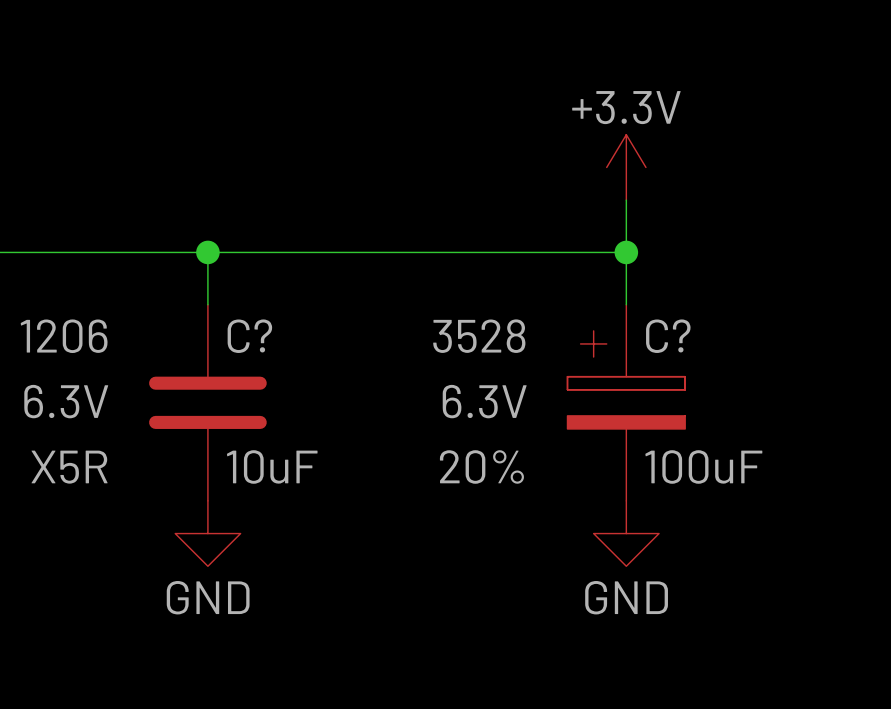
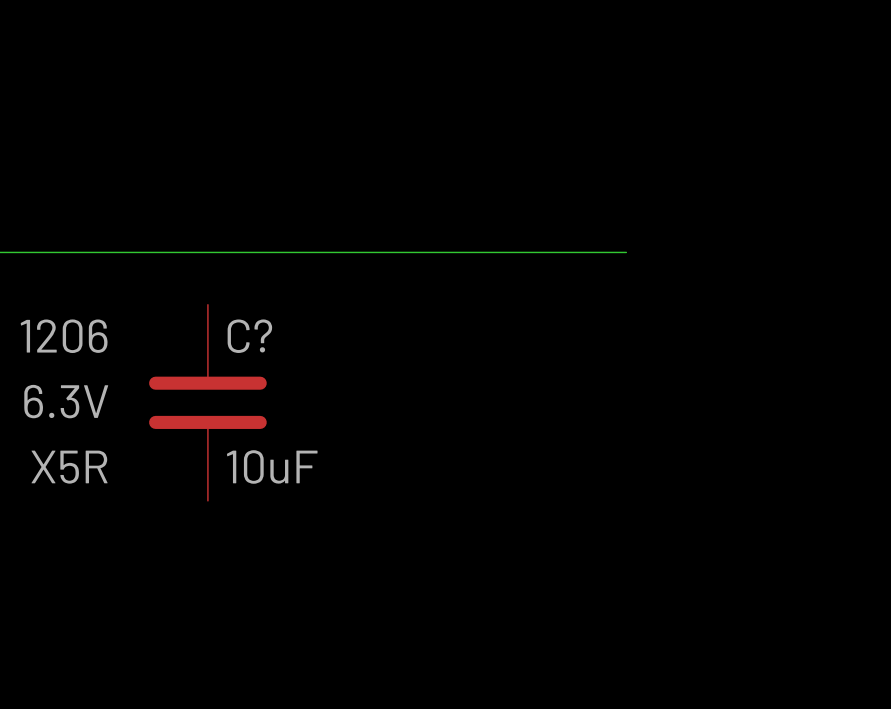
power symbol: +3.3V (626, 167) -> none
wire: (626, 200) (626, 304) -> none
wire: (207, 252) (207, 304) -> none
junction: (207, 252) -> none
junction: (626, 252) -> none
C?: 100uF (626, 402) -> none
power symbol: GND (207, 533) -> none
power symbol: GND (626, 533) -> none

